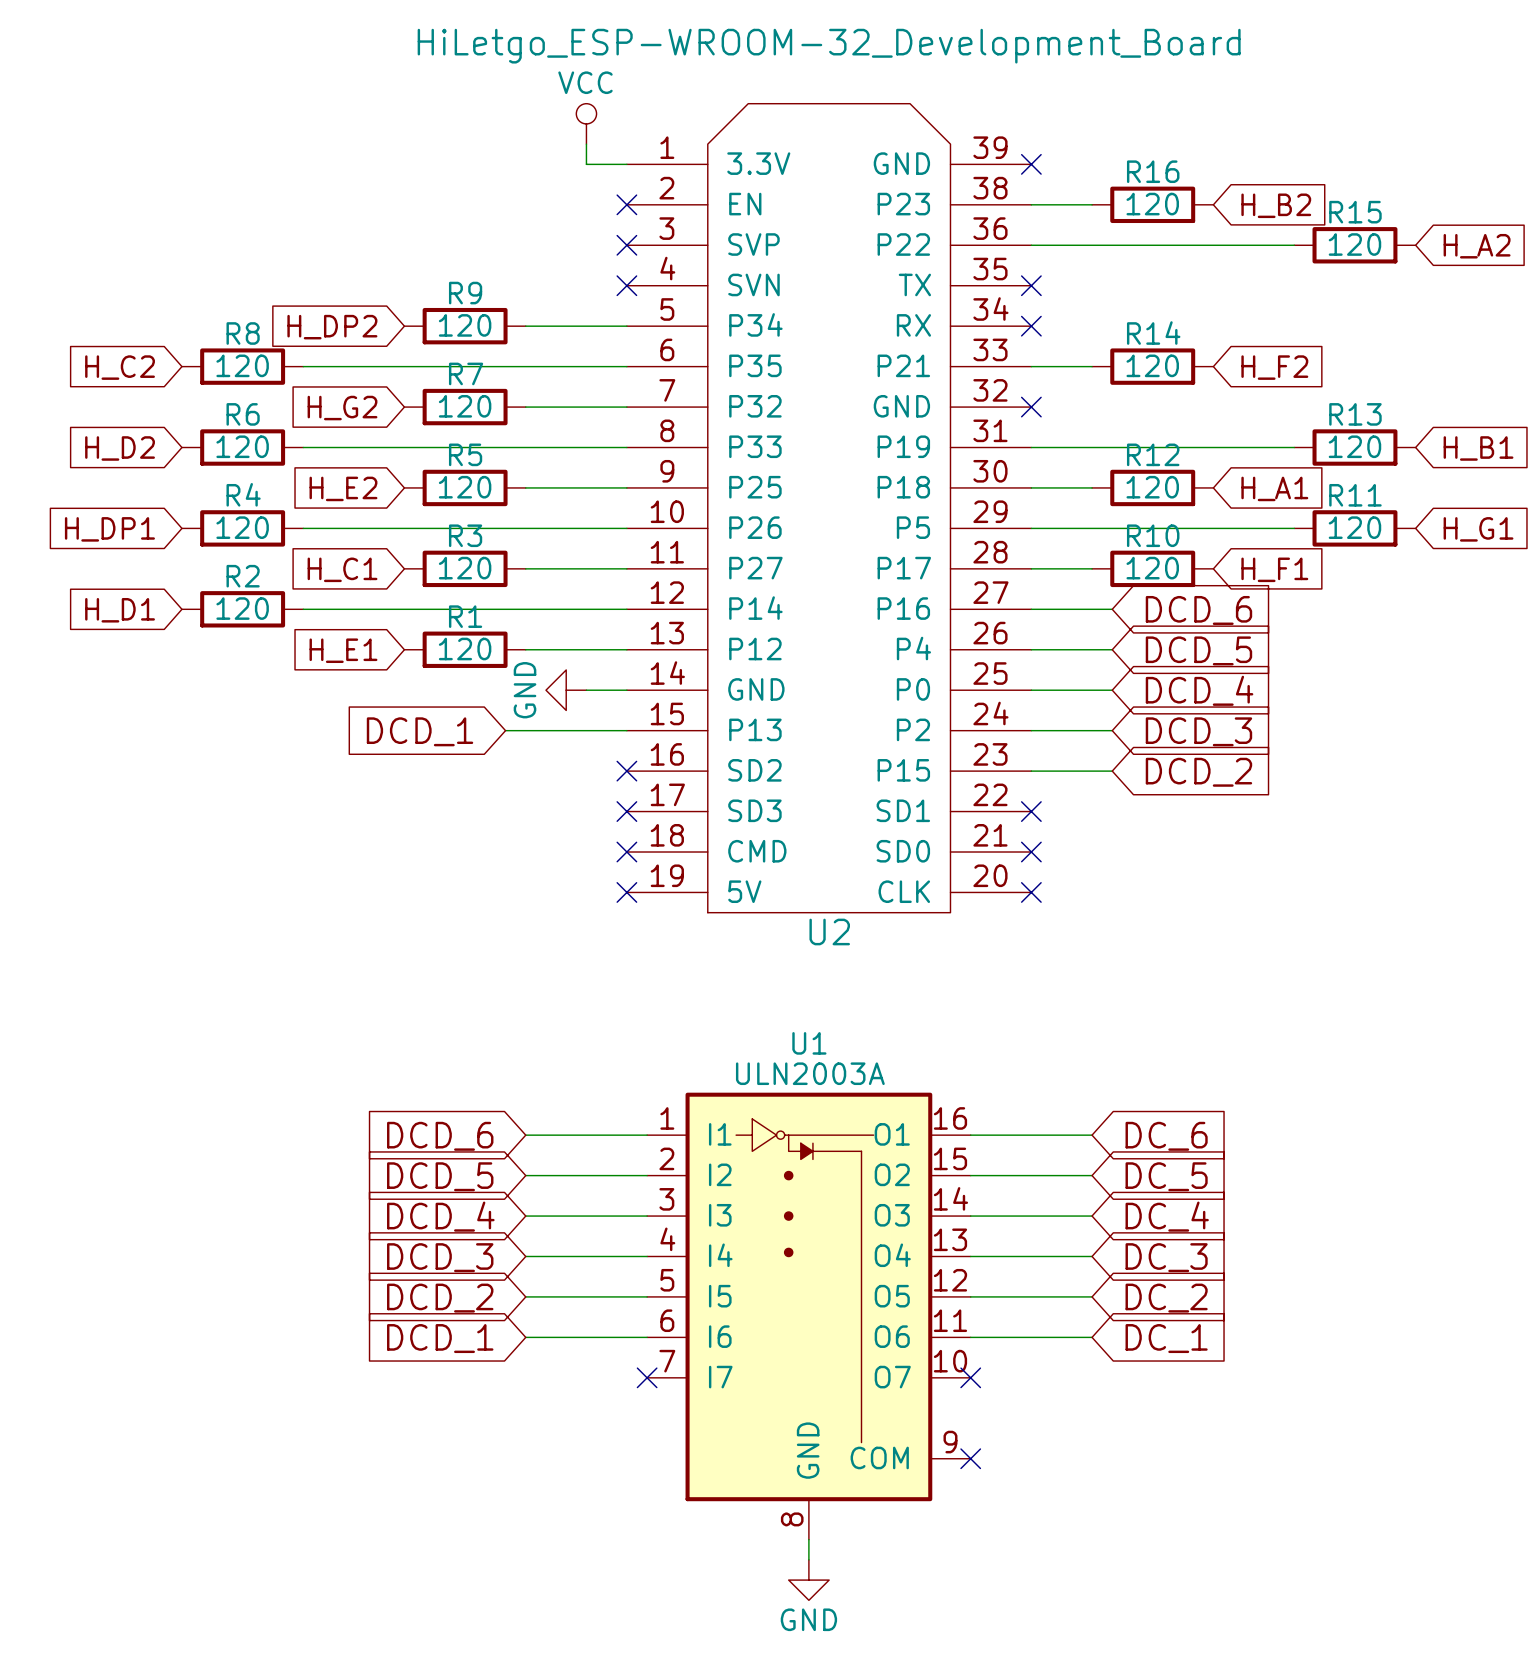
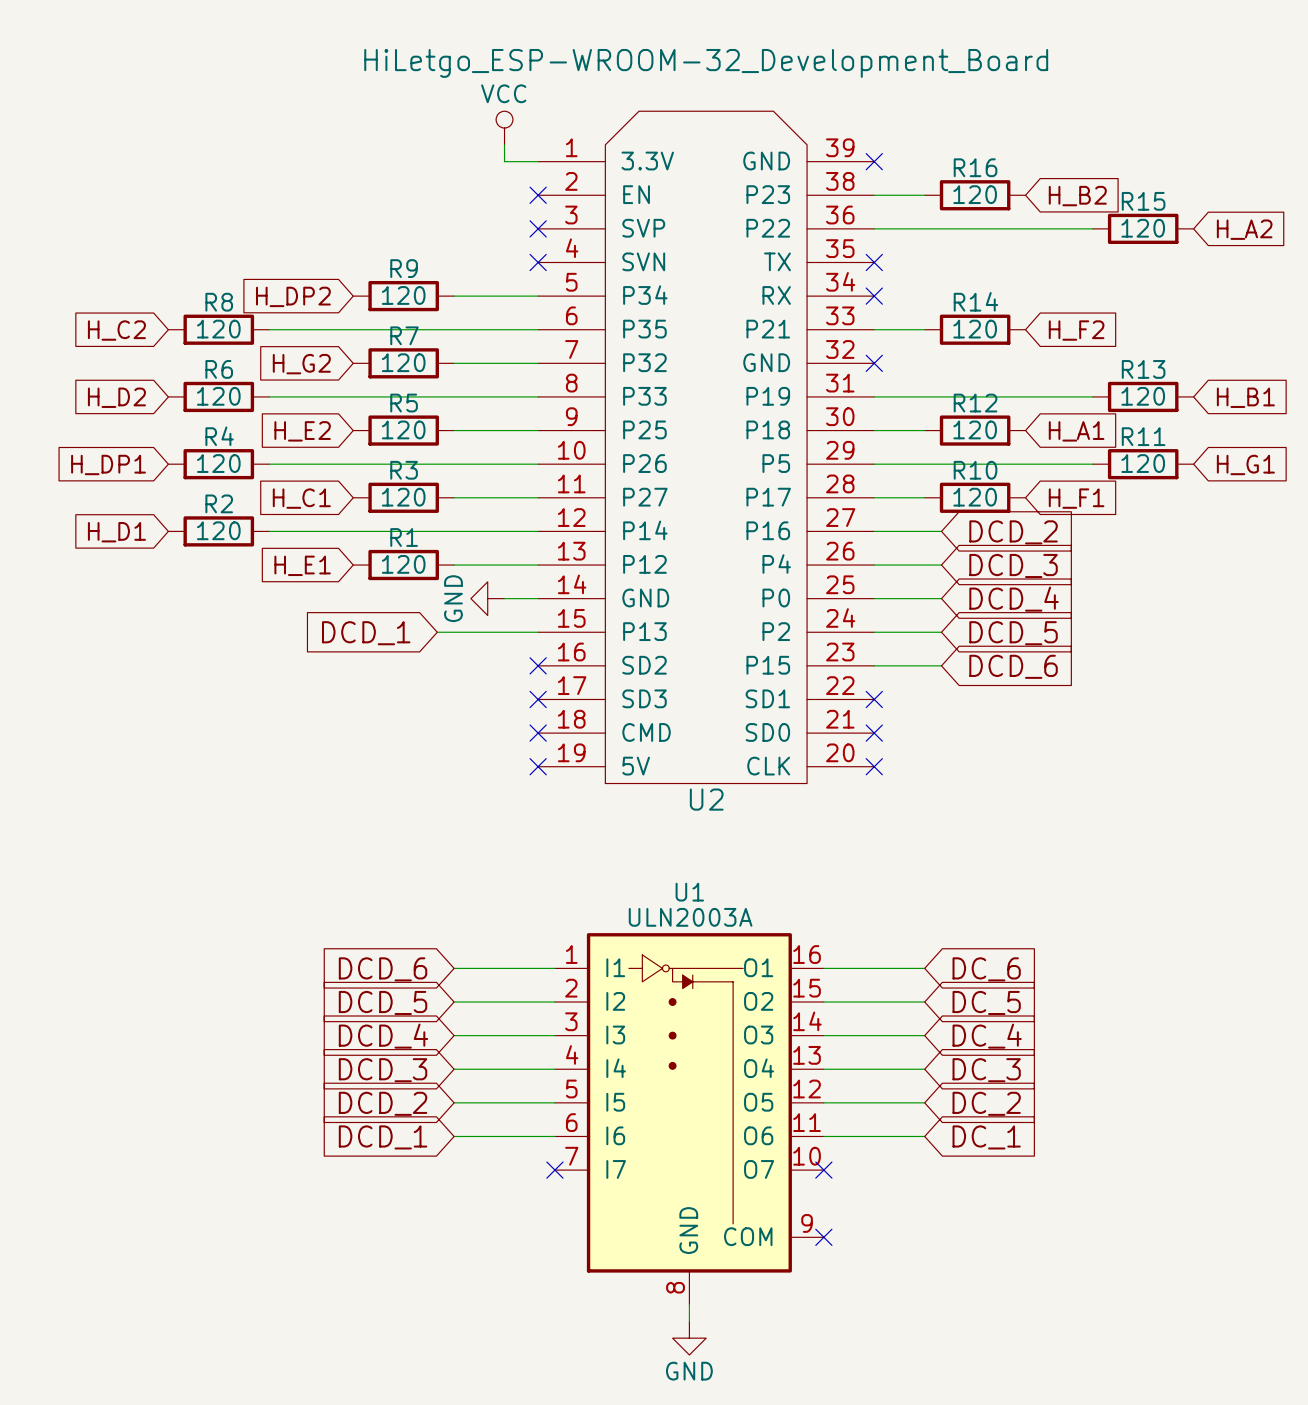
global label: DCD_6 (1198, 610) -> DCD_2 (1013, 532)
global label: DCD_5 (1198, 650) -> DCD_3 (1013, 565)
global label: DCD_3 (1198, 731) -> DCD_5 (1013, 633)
global label: DCD_2 (1198, 772) -> DCD_6 (1013, 666)

